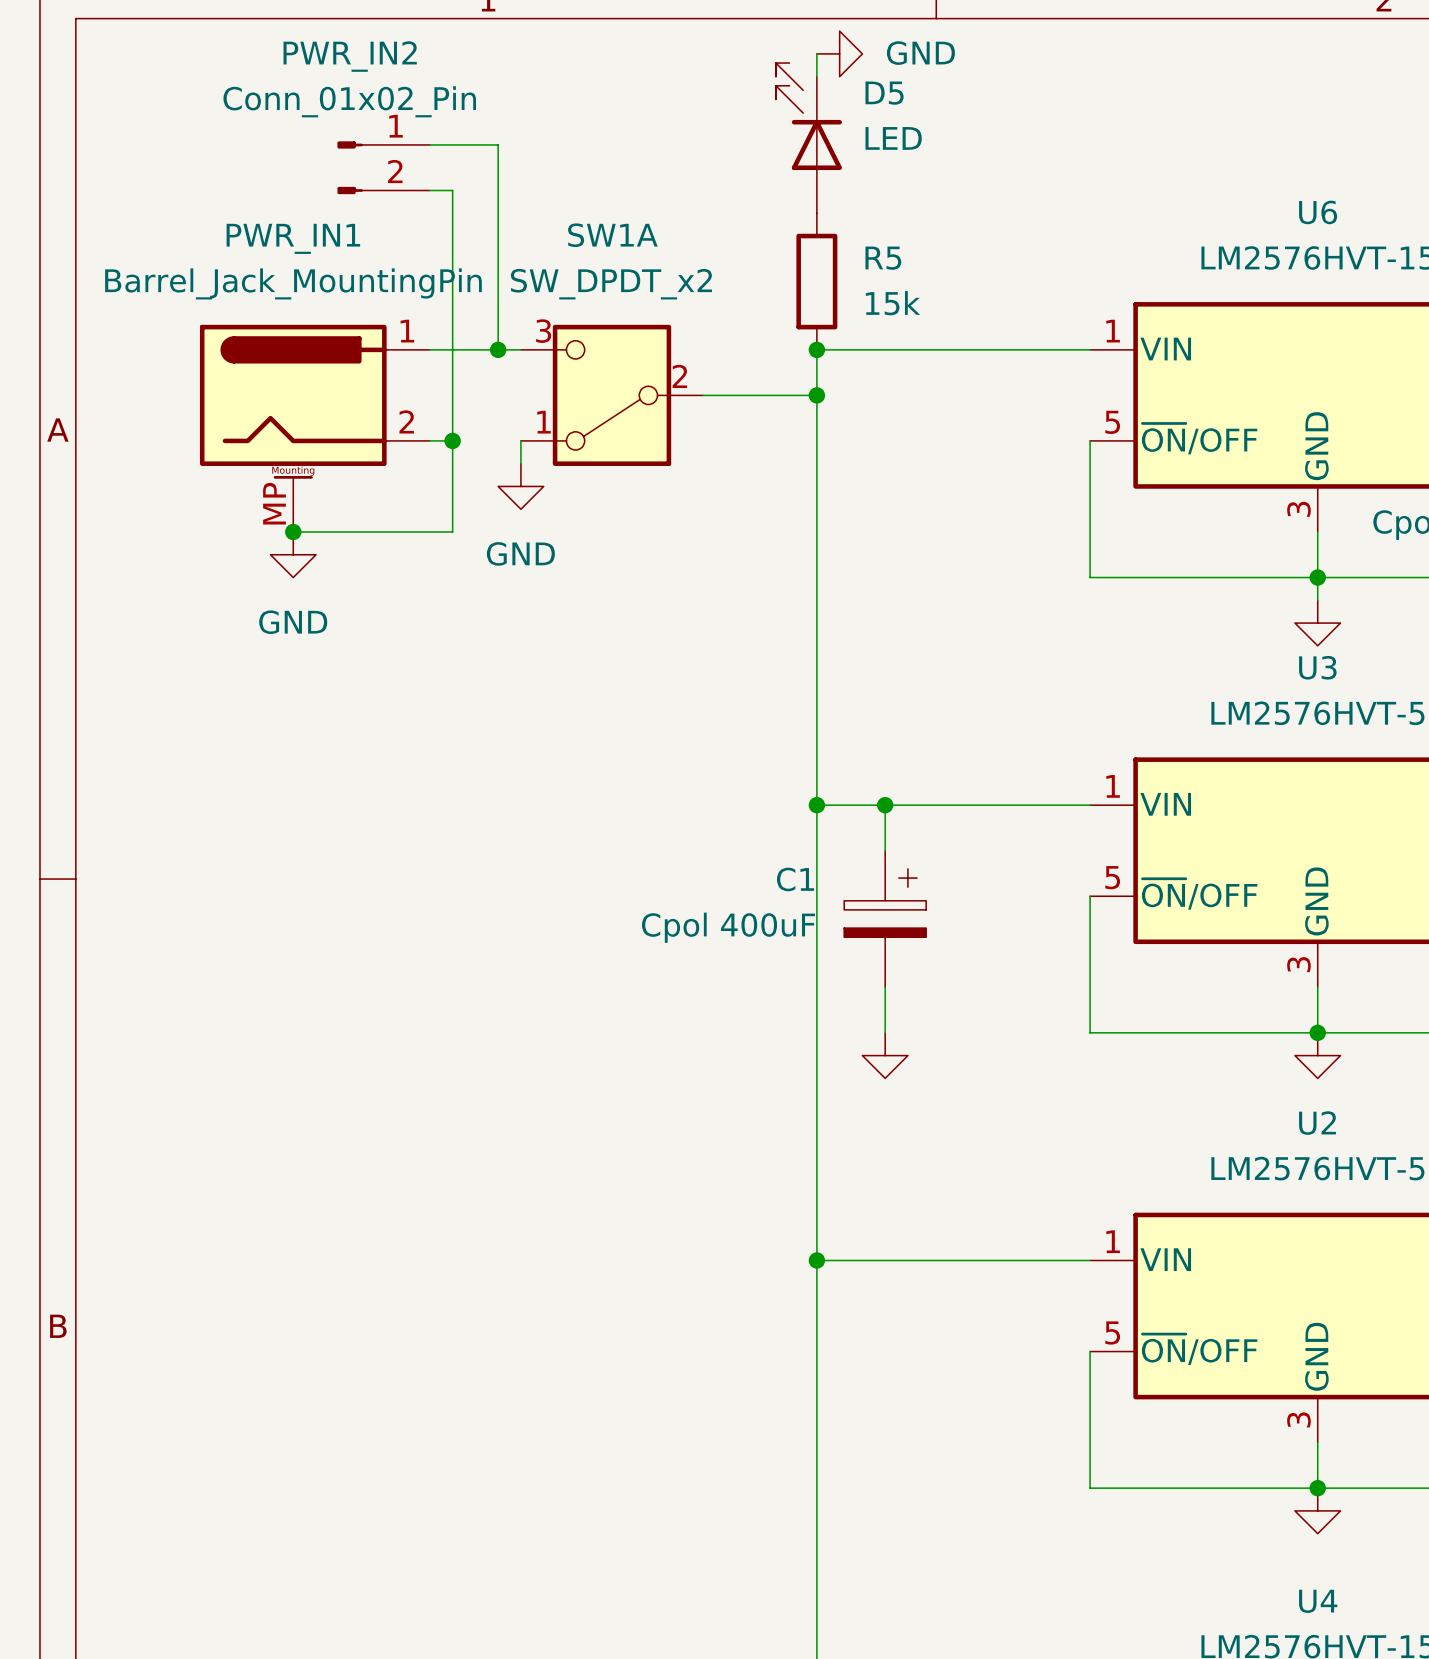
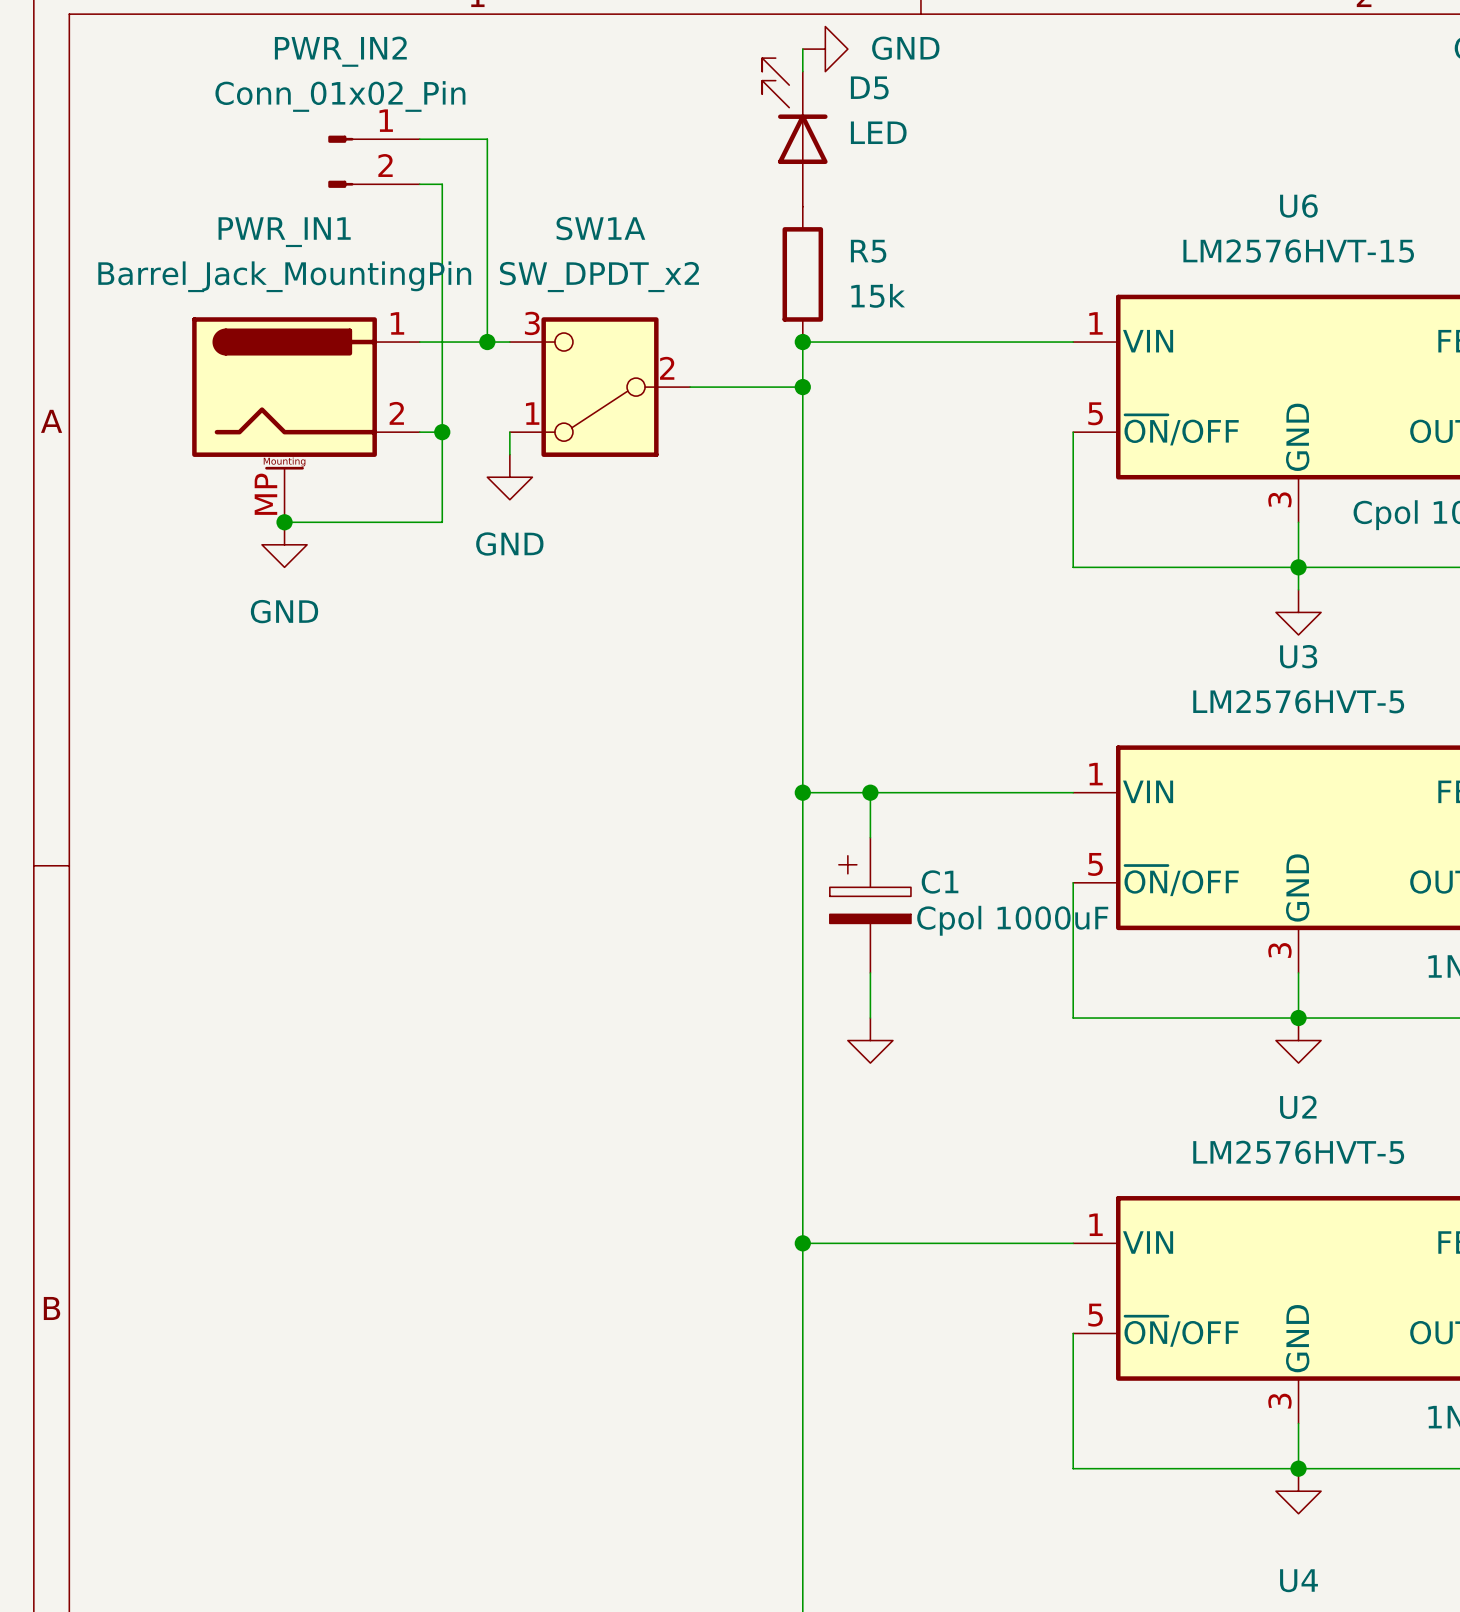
C1 flip: as is (885, 903) -> left-right (870, 889)
C1 value: Cpol 400uF (728, 927) -> Cpol 1000uF (1012, 920)

